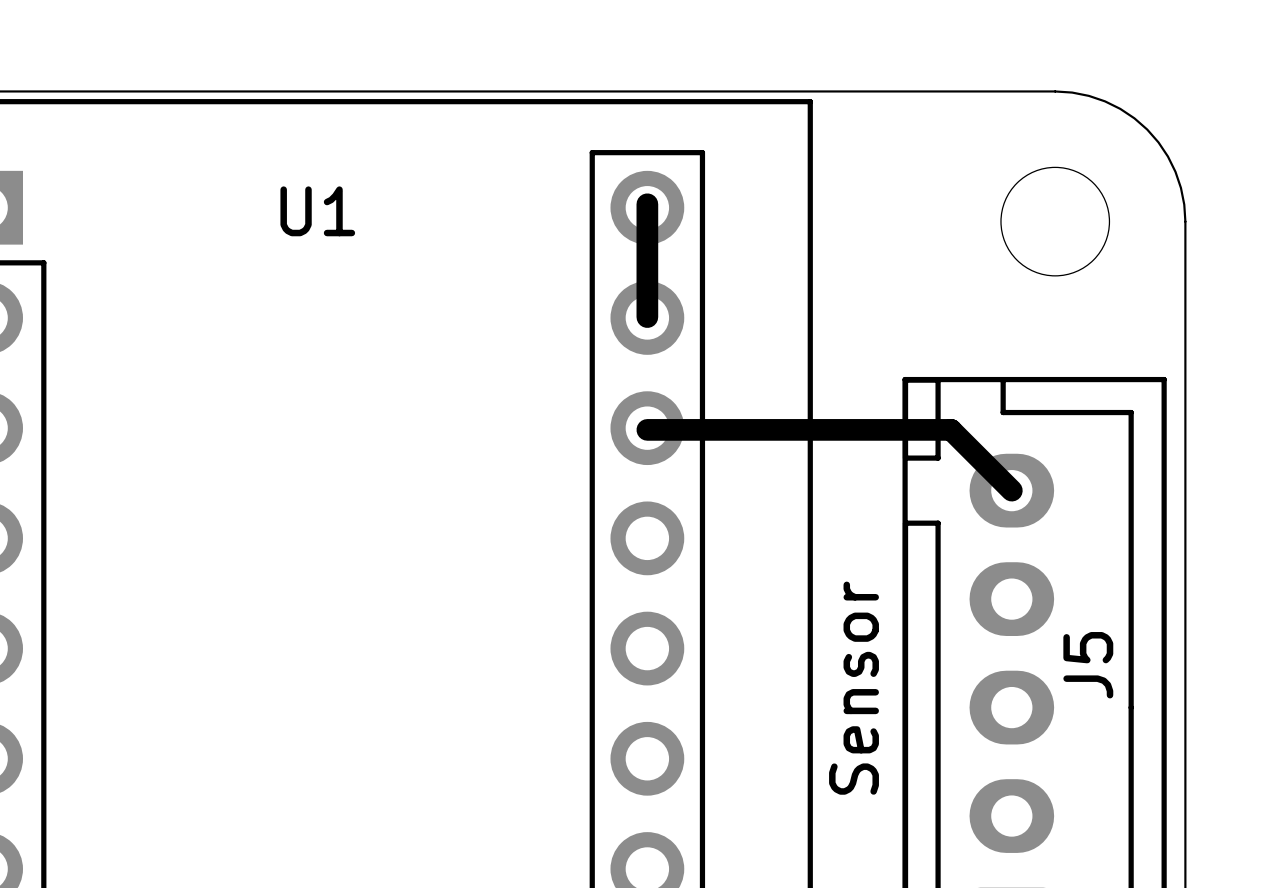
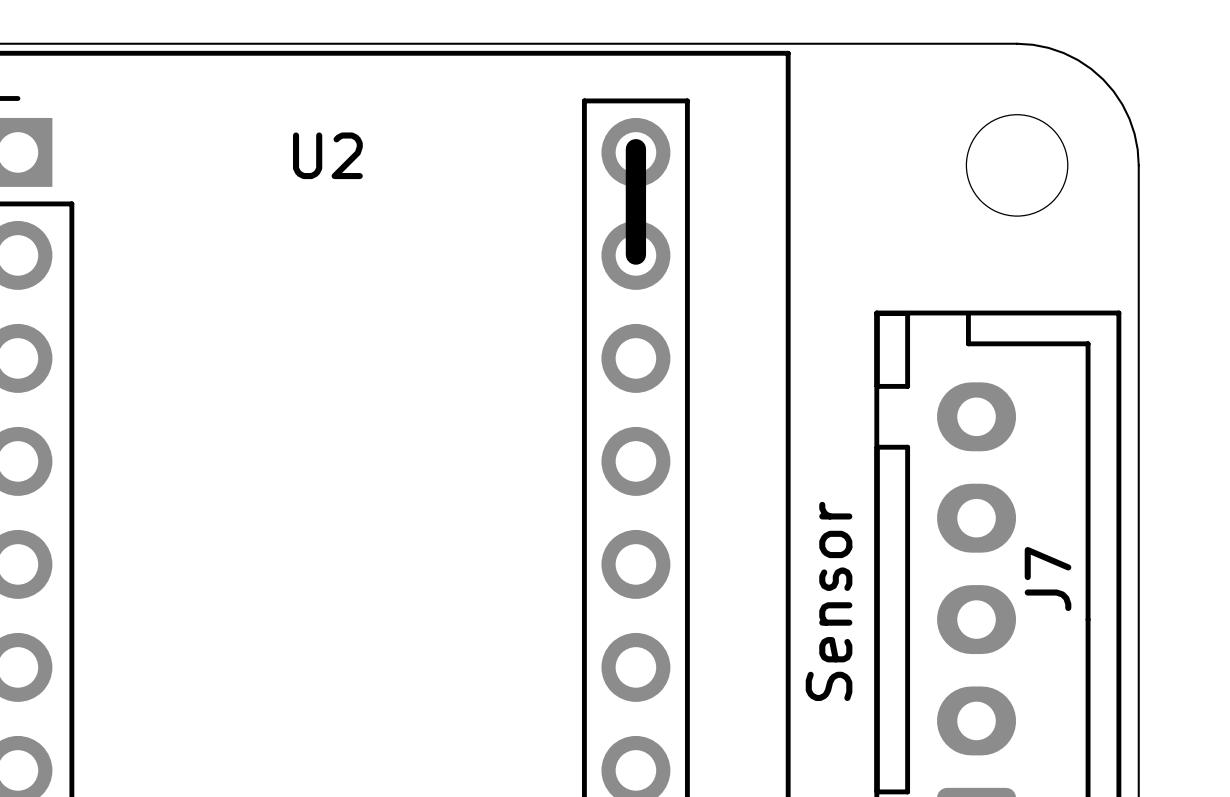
U1 name: U1 (317, 211) -> U2 (327, 155)
line: (647, 429) (951, 429) (1011, 490) -> none
J5 name: J5 (1088, 665) -> J7 (1048, 579)

